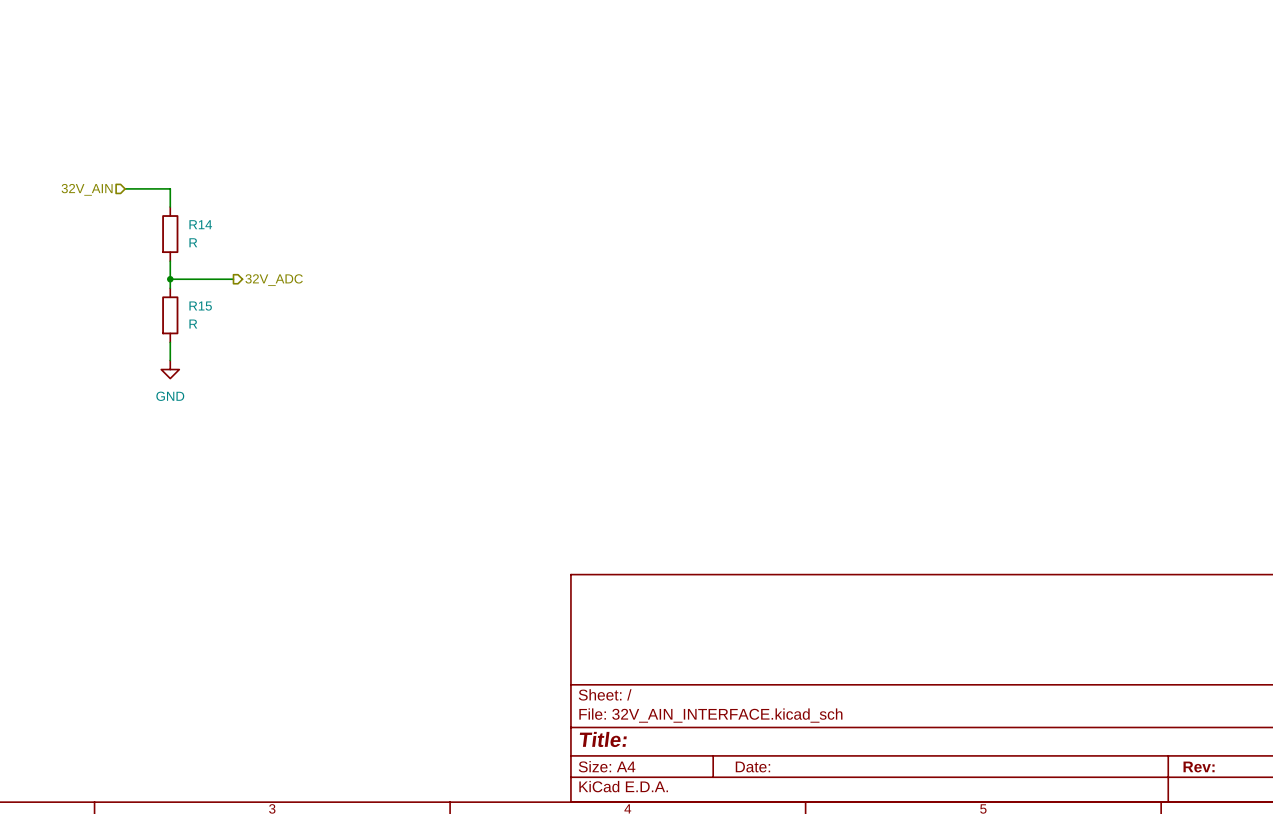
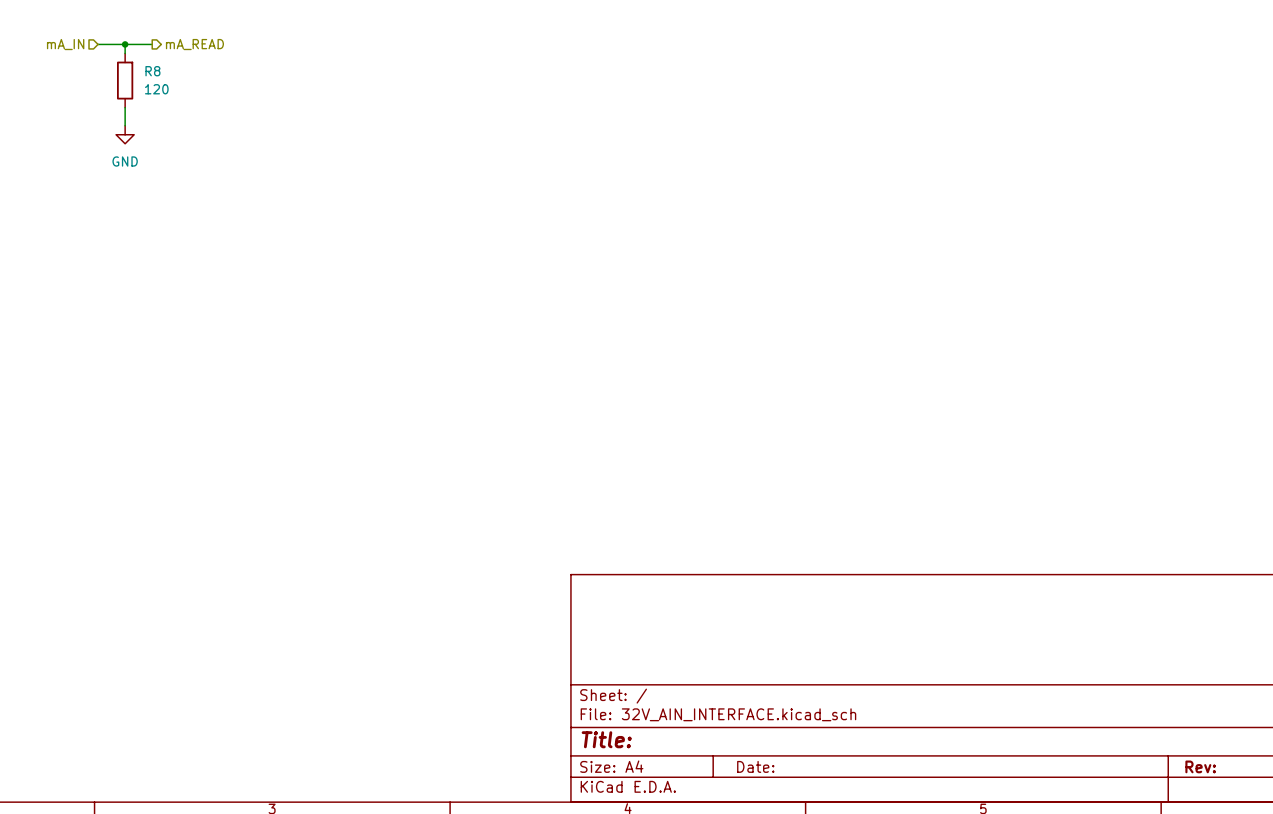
wire: none -> (98, 44) (152, 44)
wire: none -> (125, 44) (125, 53)
junction: none -> (125, 44)
hierarchical label: none -> mA_IN (65, 44)
hierarchical label: none -> mA_READ (194, 44)
R8: none -> 120 (125, 80)
wire: none -> (125, 107) (125, 125)
power symbol: none -> GND (125, 134)
wire: (125, 188) (170, 188) (170, 206) -> none
hierarchical label: 32V_AIN (87, 189) -> none
R14: R (170, 234) -> none
wire: (170, 261) (170, 288) -> none
wire: (170, 279) (233, 279) -> none
junction: (170, 279) -> none
hierarchical label: 32V_ADC (274, 280) -> none
R15: R (170, 315) -> none
wire: (170, 342) (170, 360) -> none
power symbol: GND (170, 369) -> none

